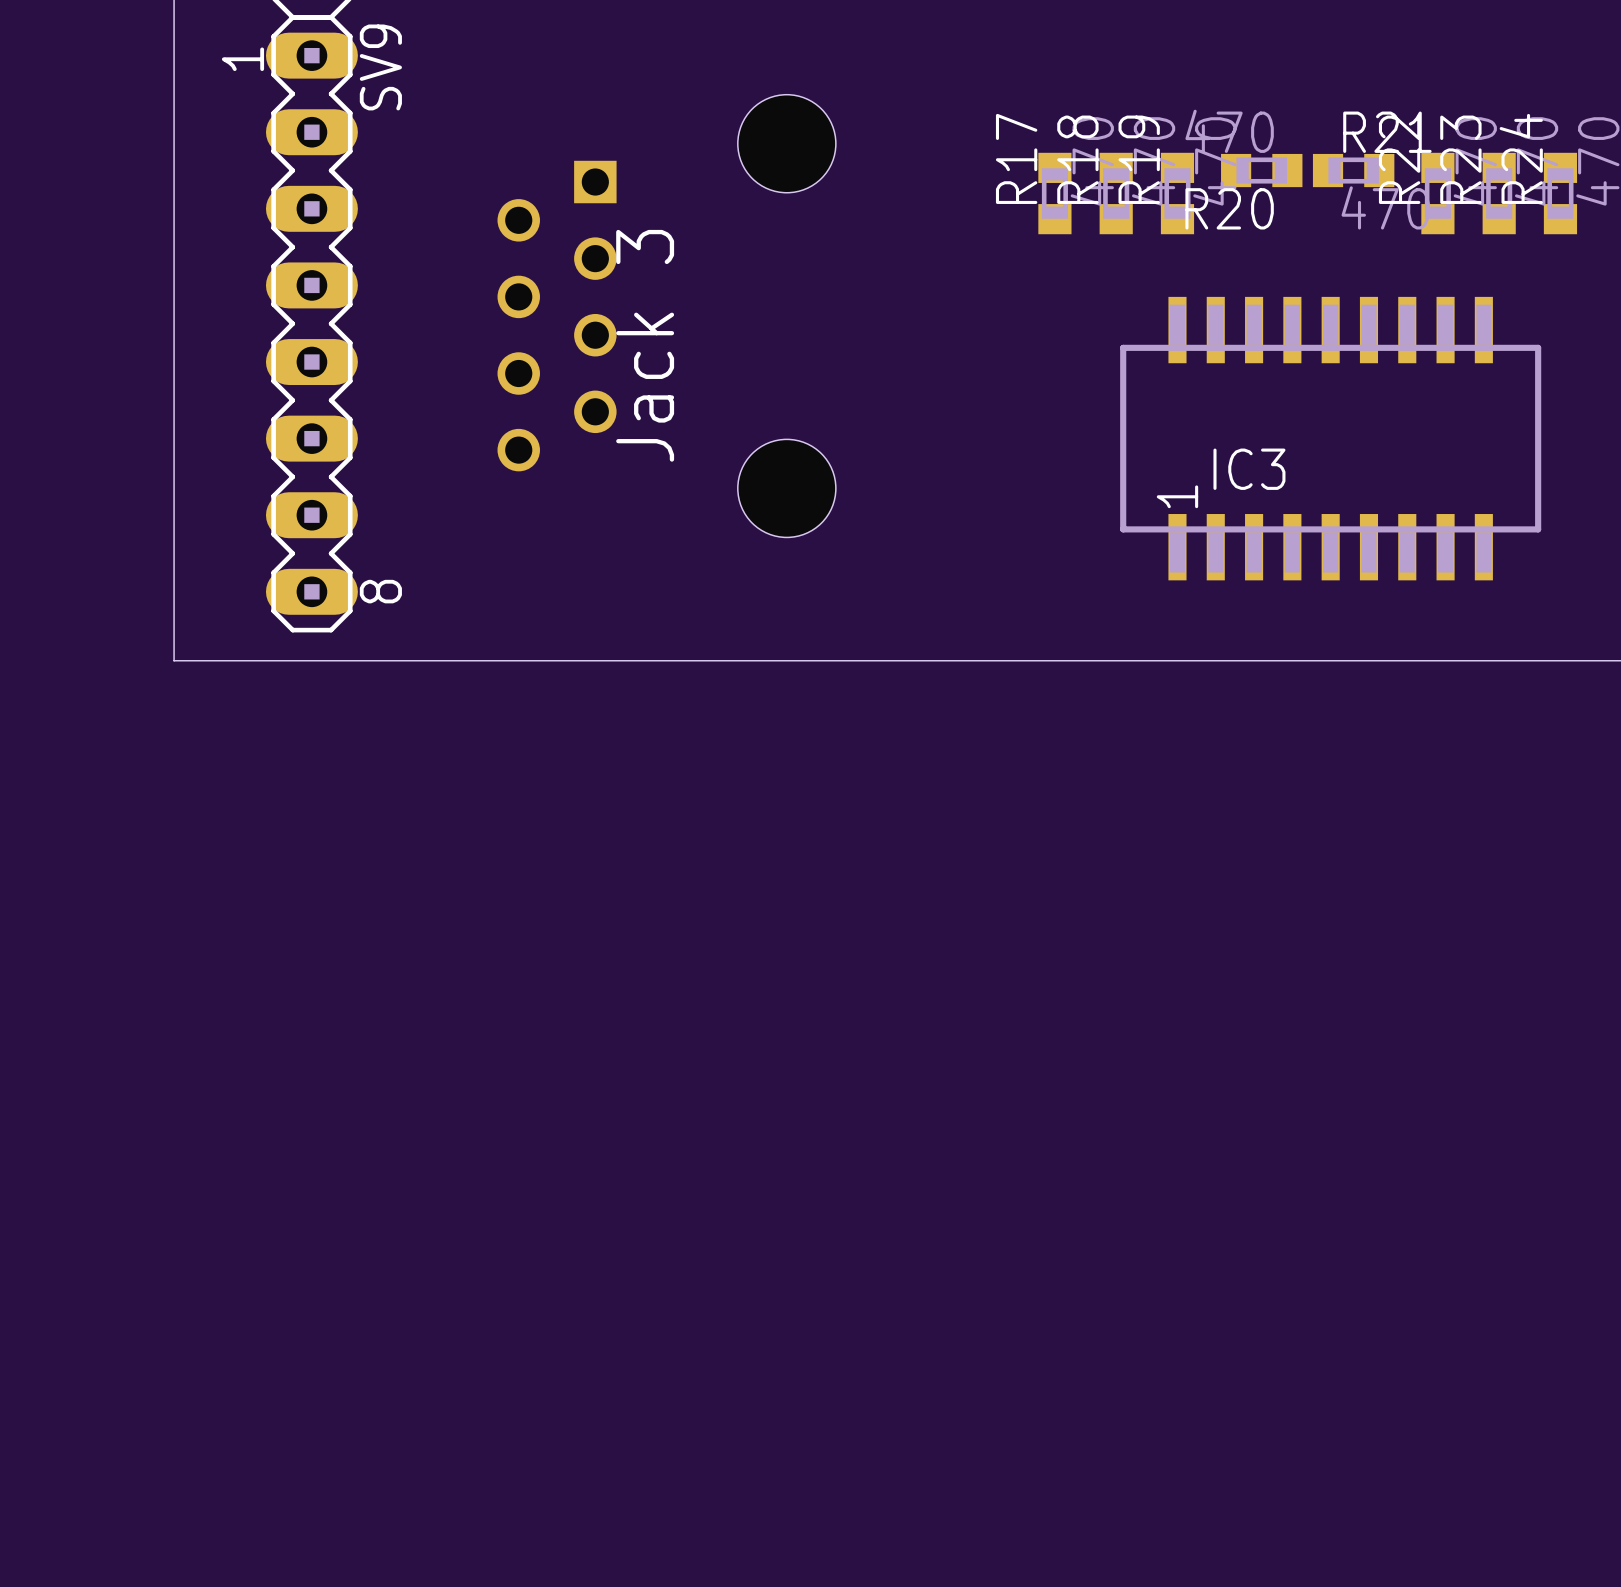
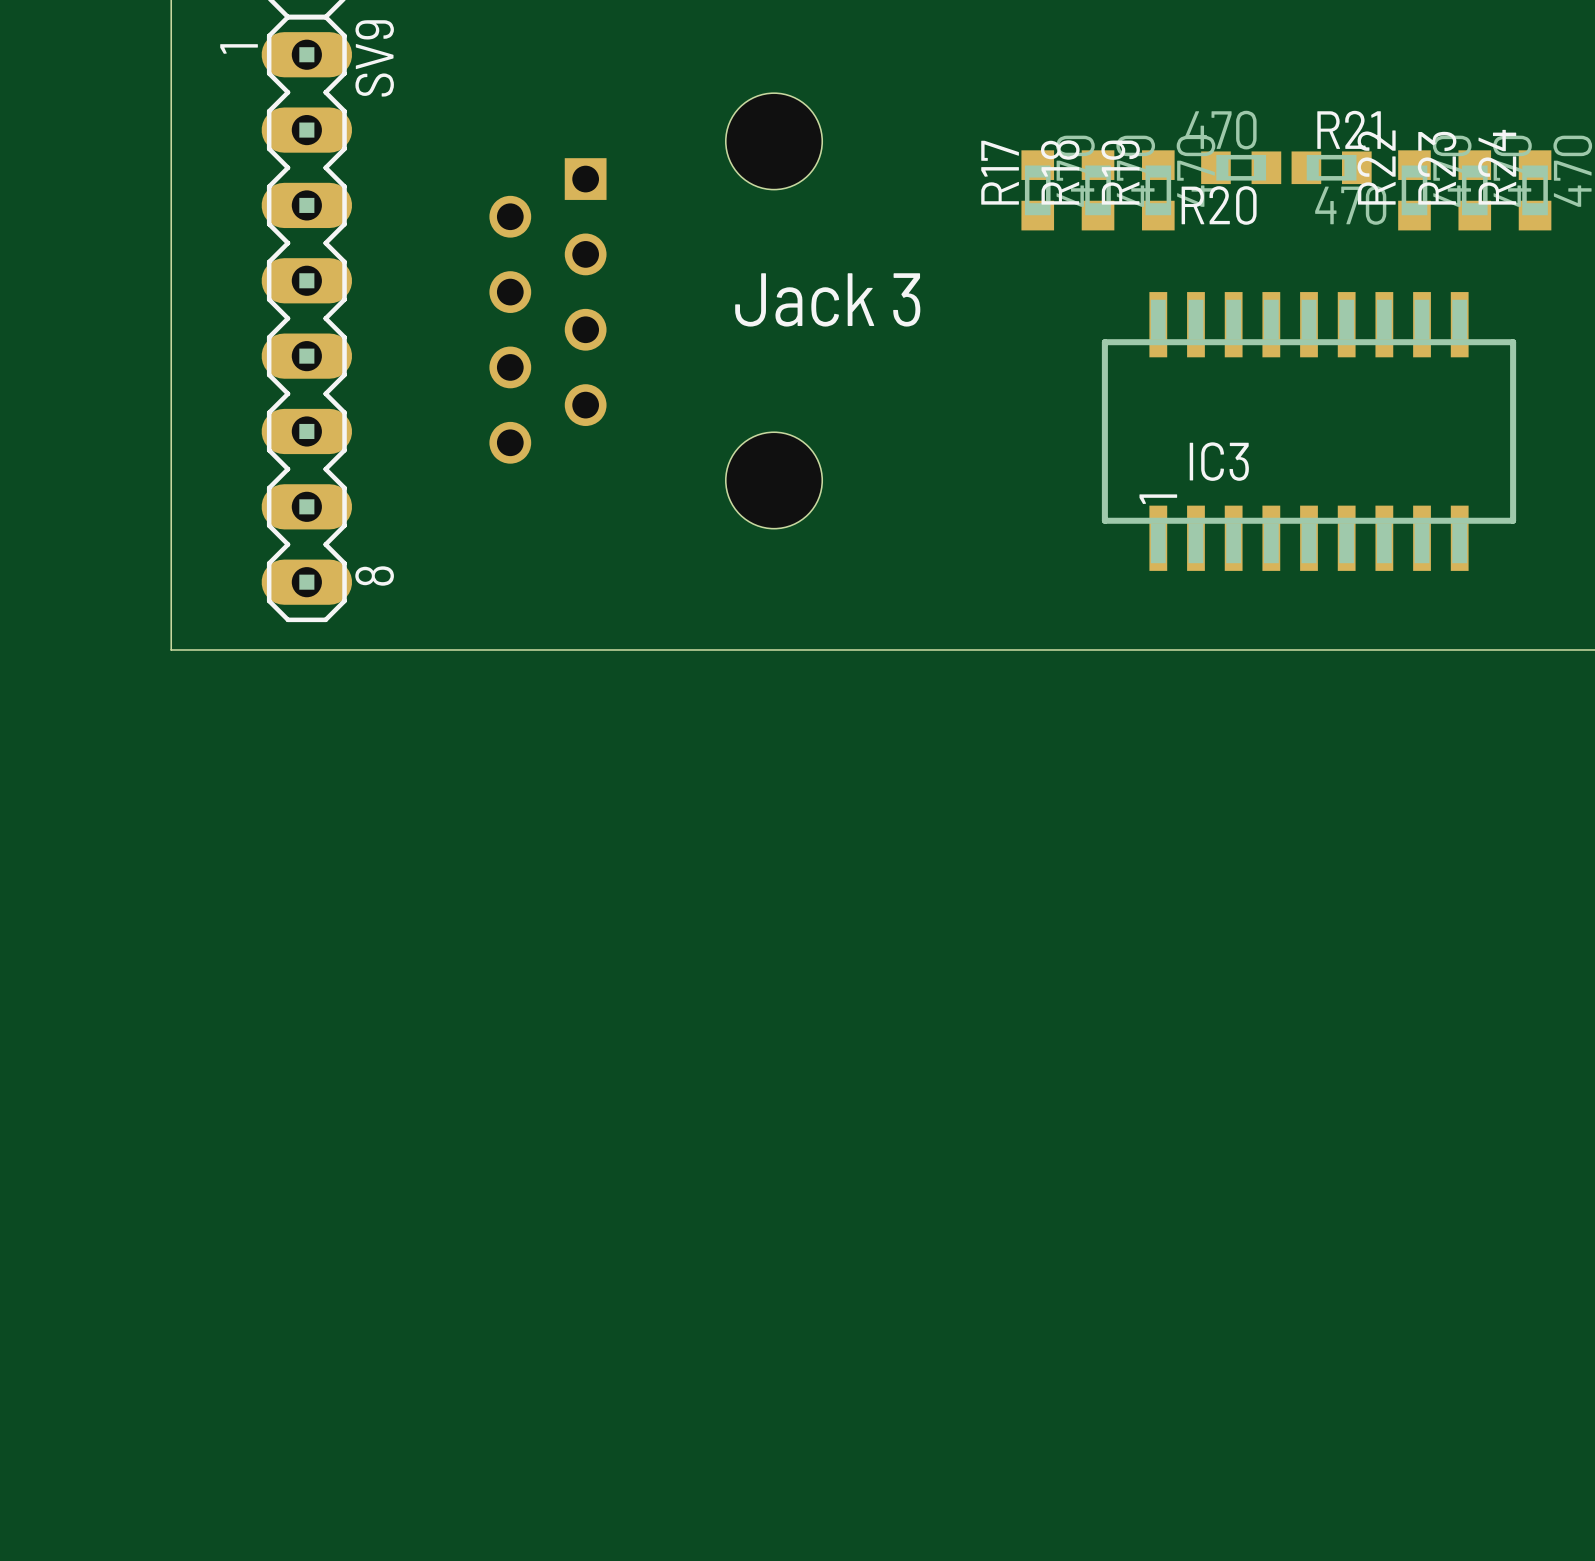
text rotation: 0° (645, 345) -> 90° clockwise (827, 299)

